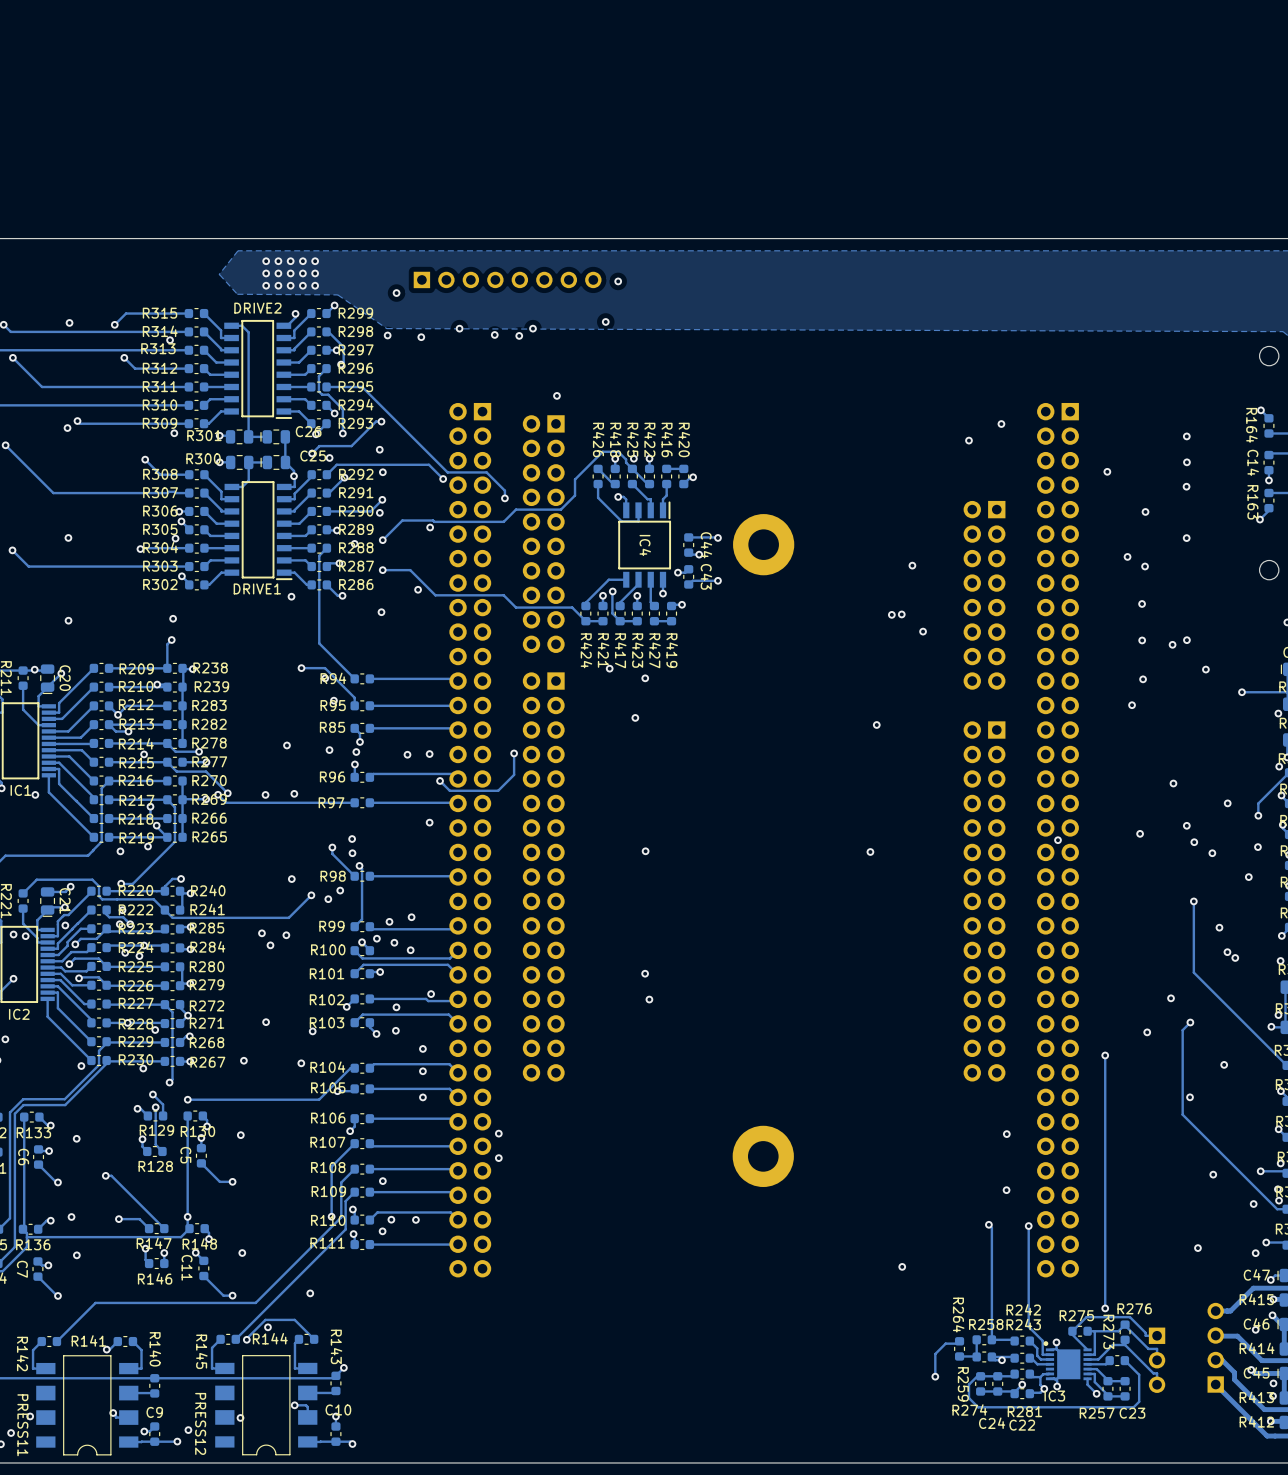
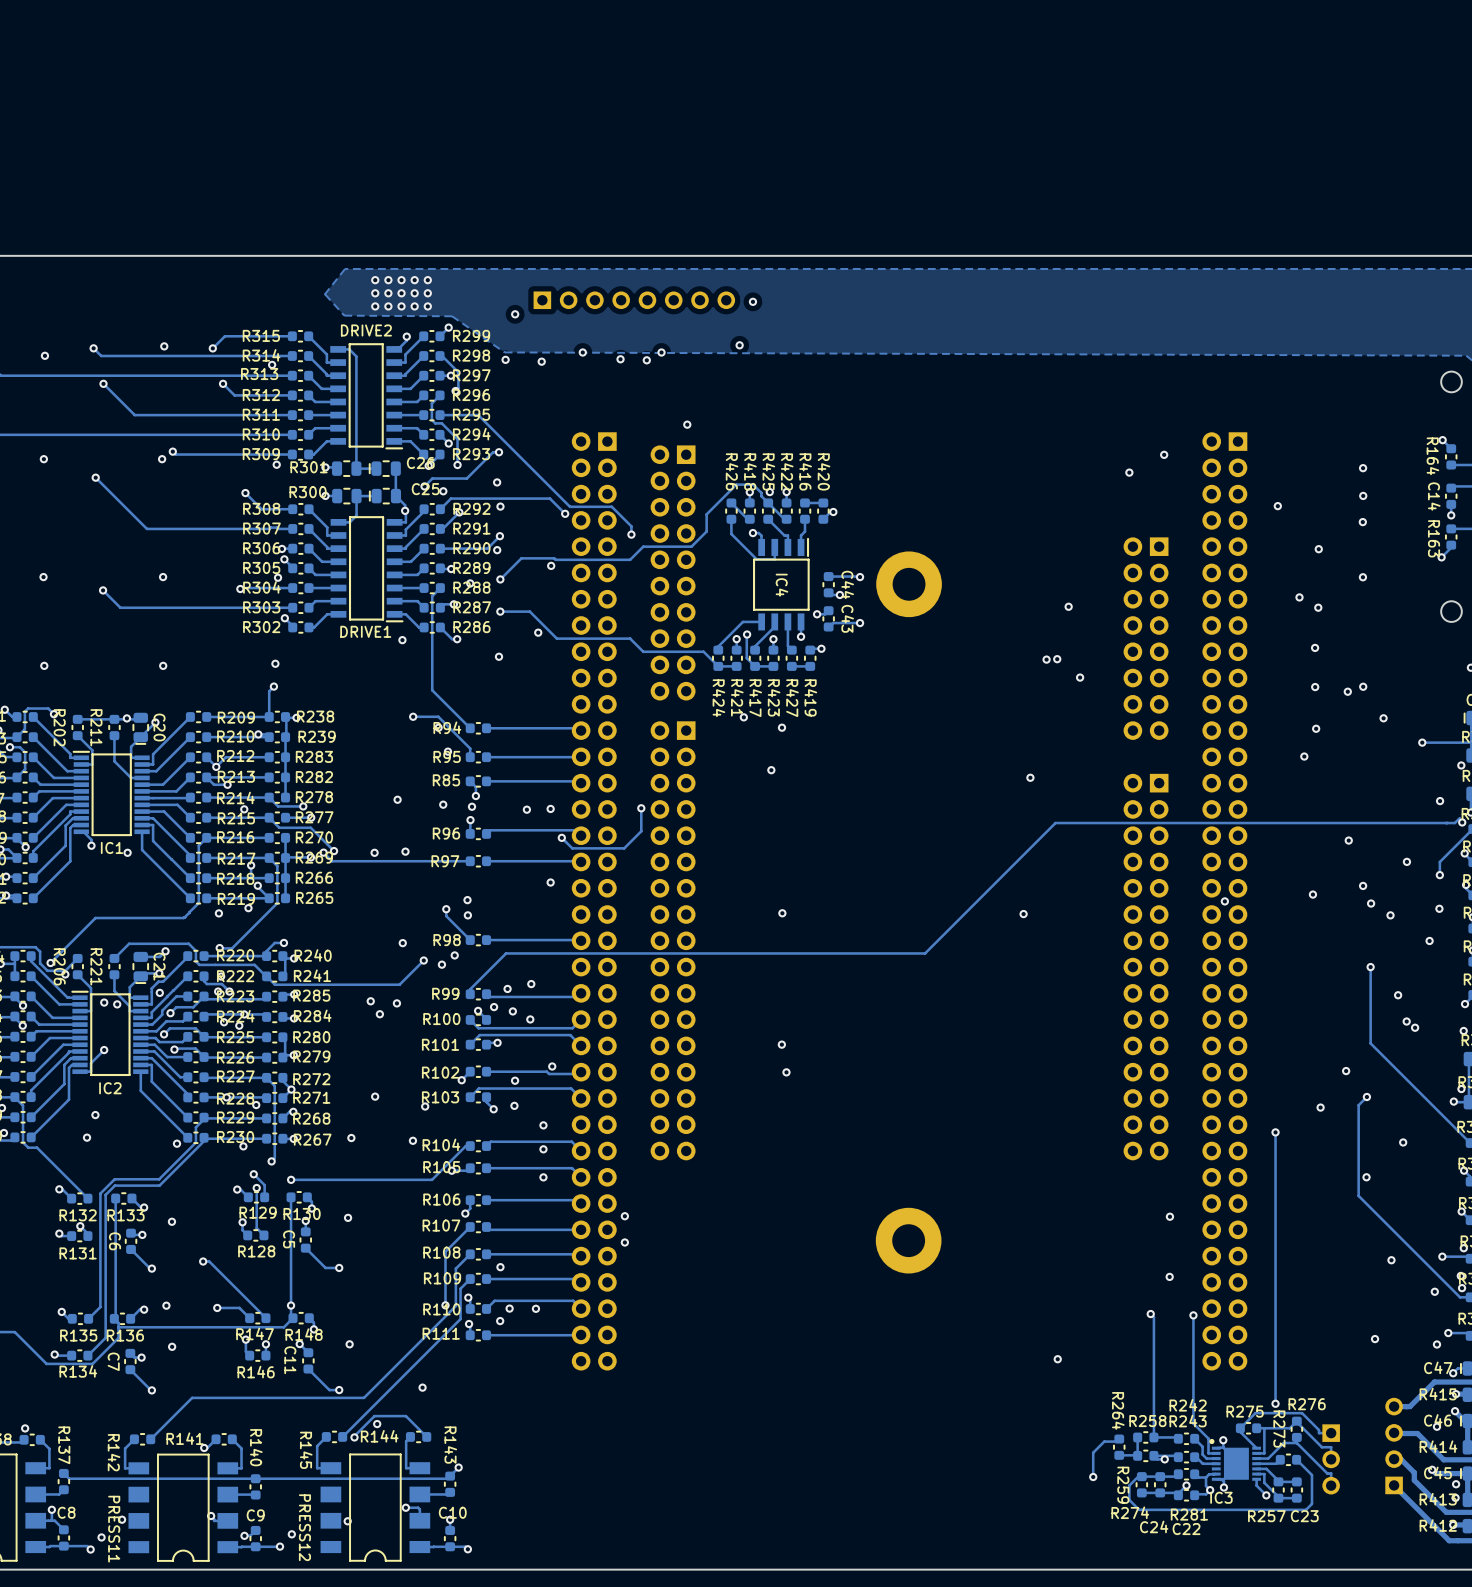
via: none -> (1440, 801)
track: (359, 865) (362, 868) (362, 919) (354, 926) -> (1459, 818) (1454, 823) (1055, 823) (925, 953) (506, 953) (470, 989) (470, 994)
via: (359, 865) -> none

